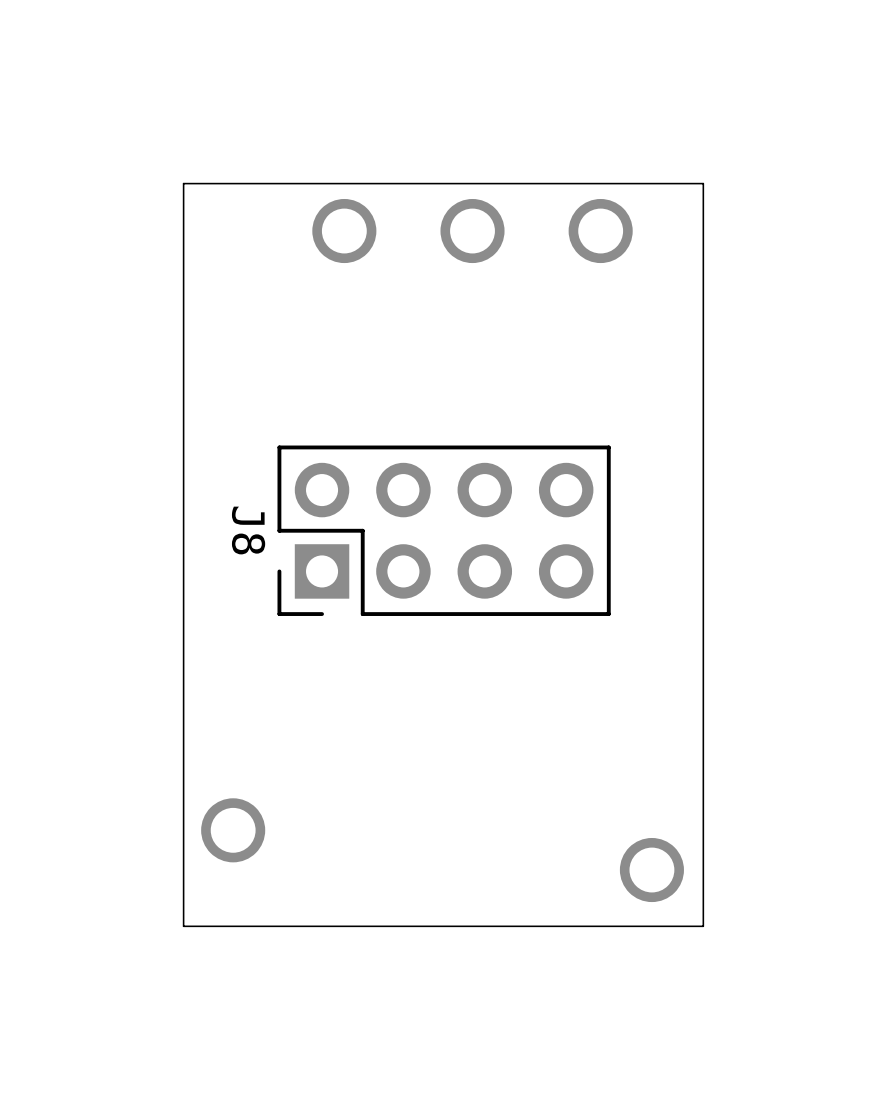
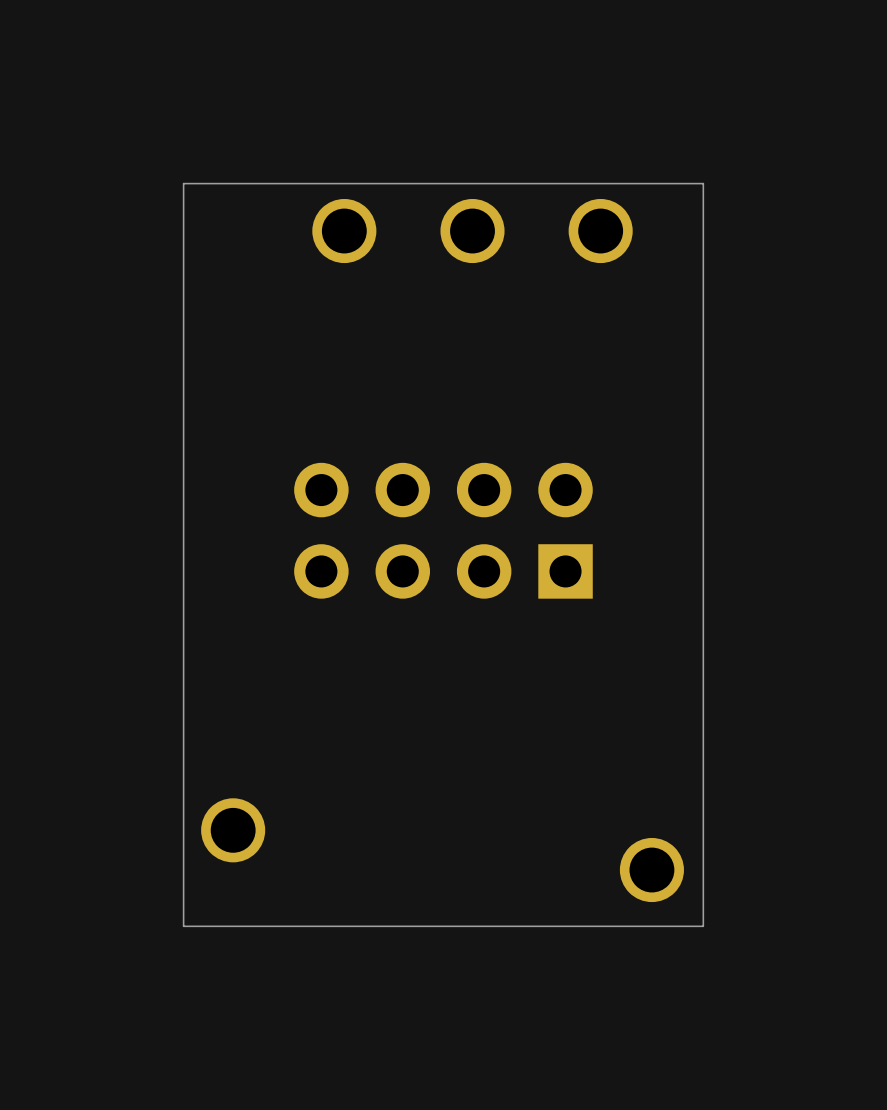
J8 side: bottom (444, 530) -> top (443, 530)

